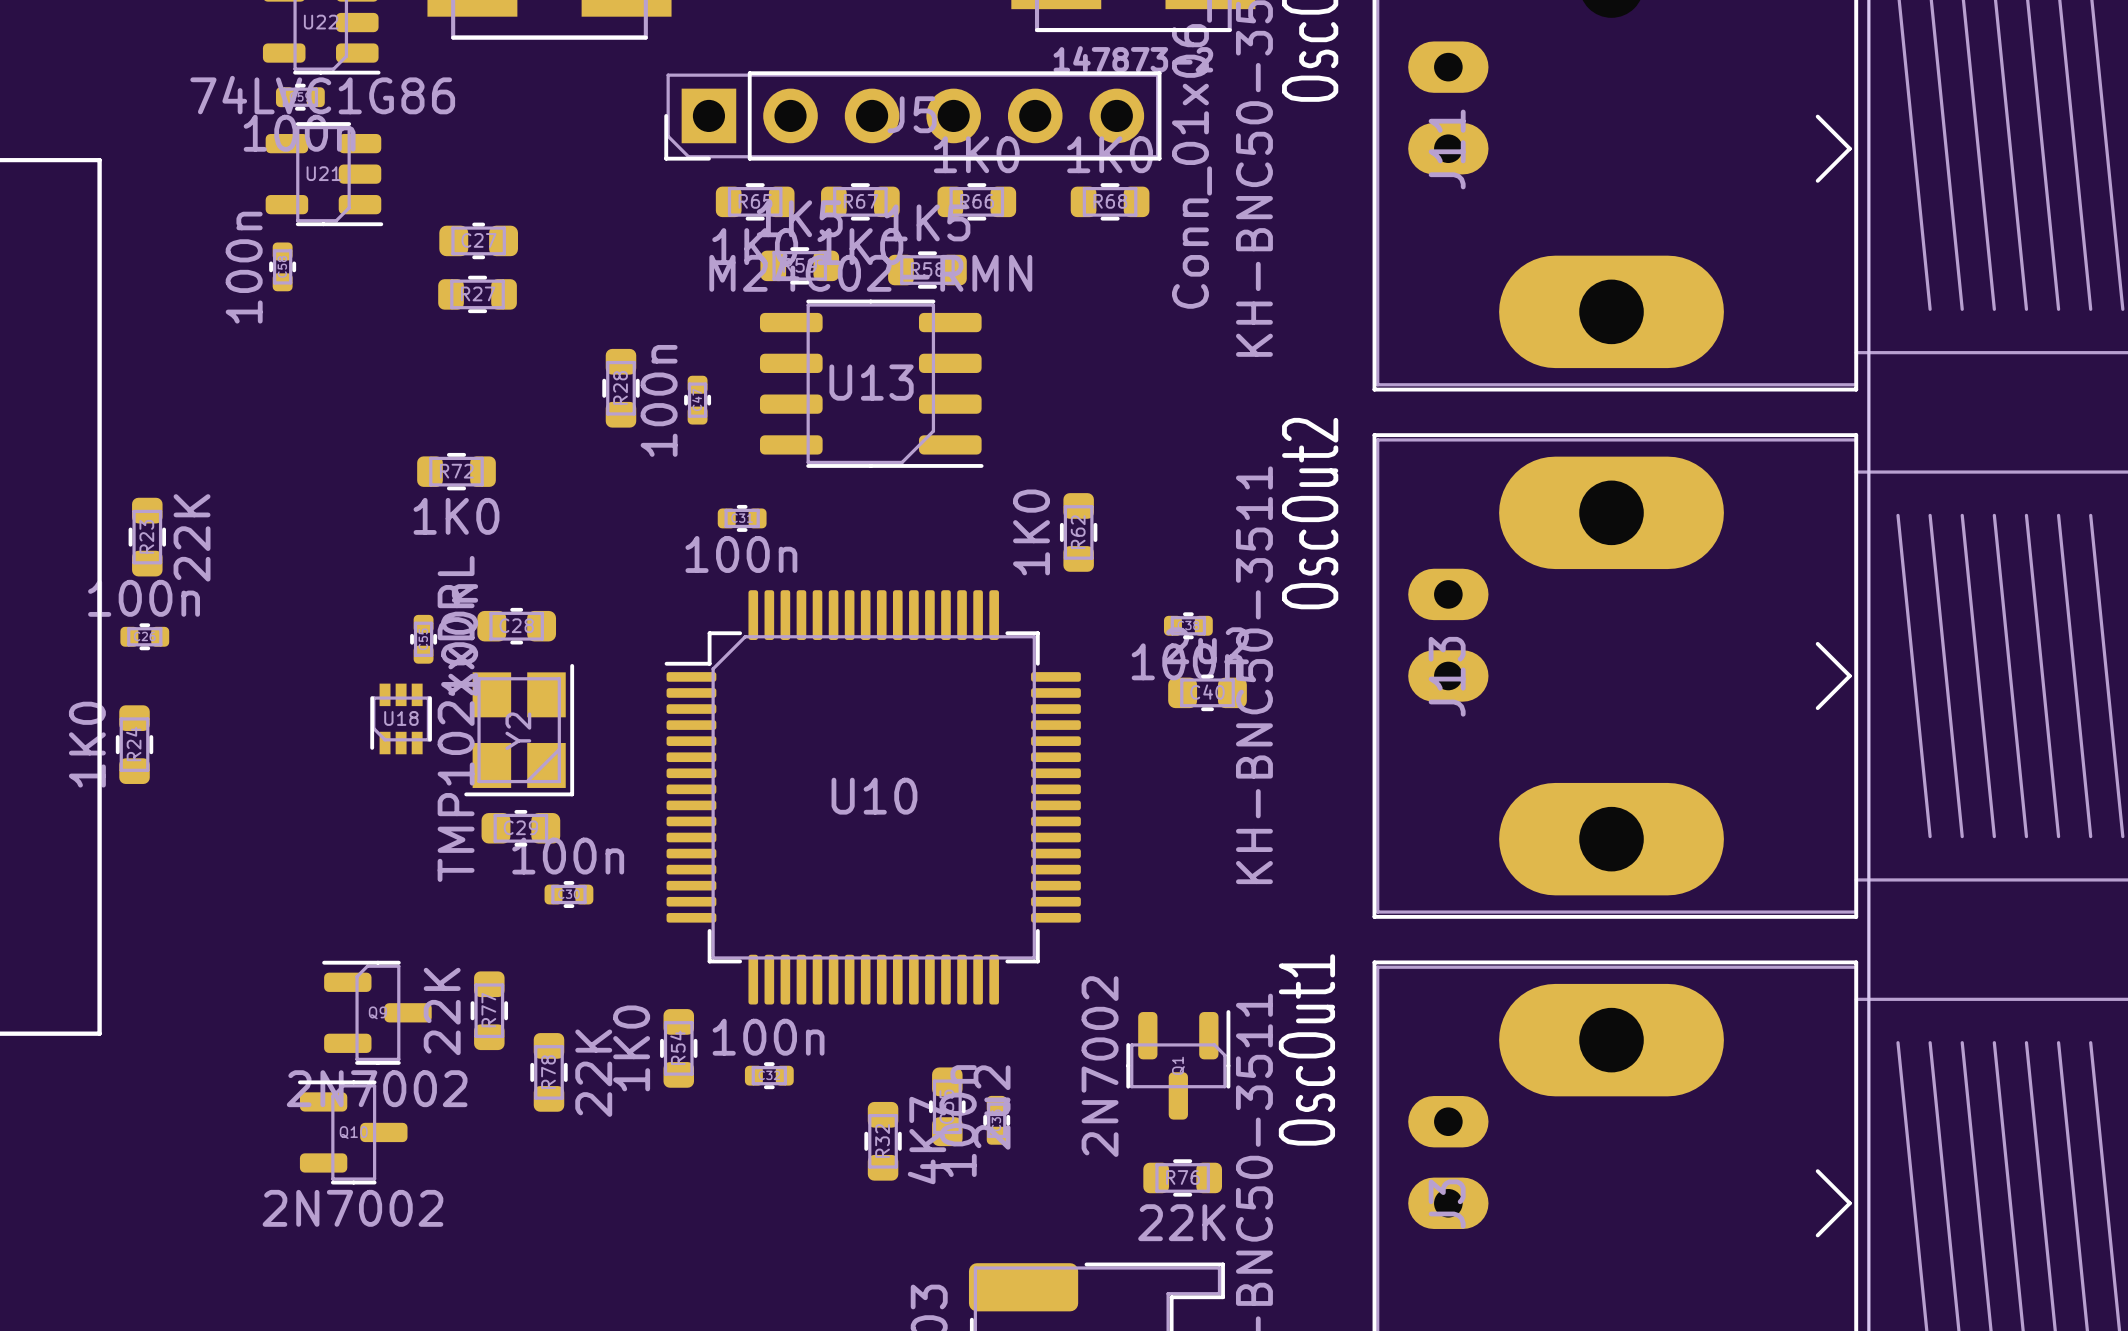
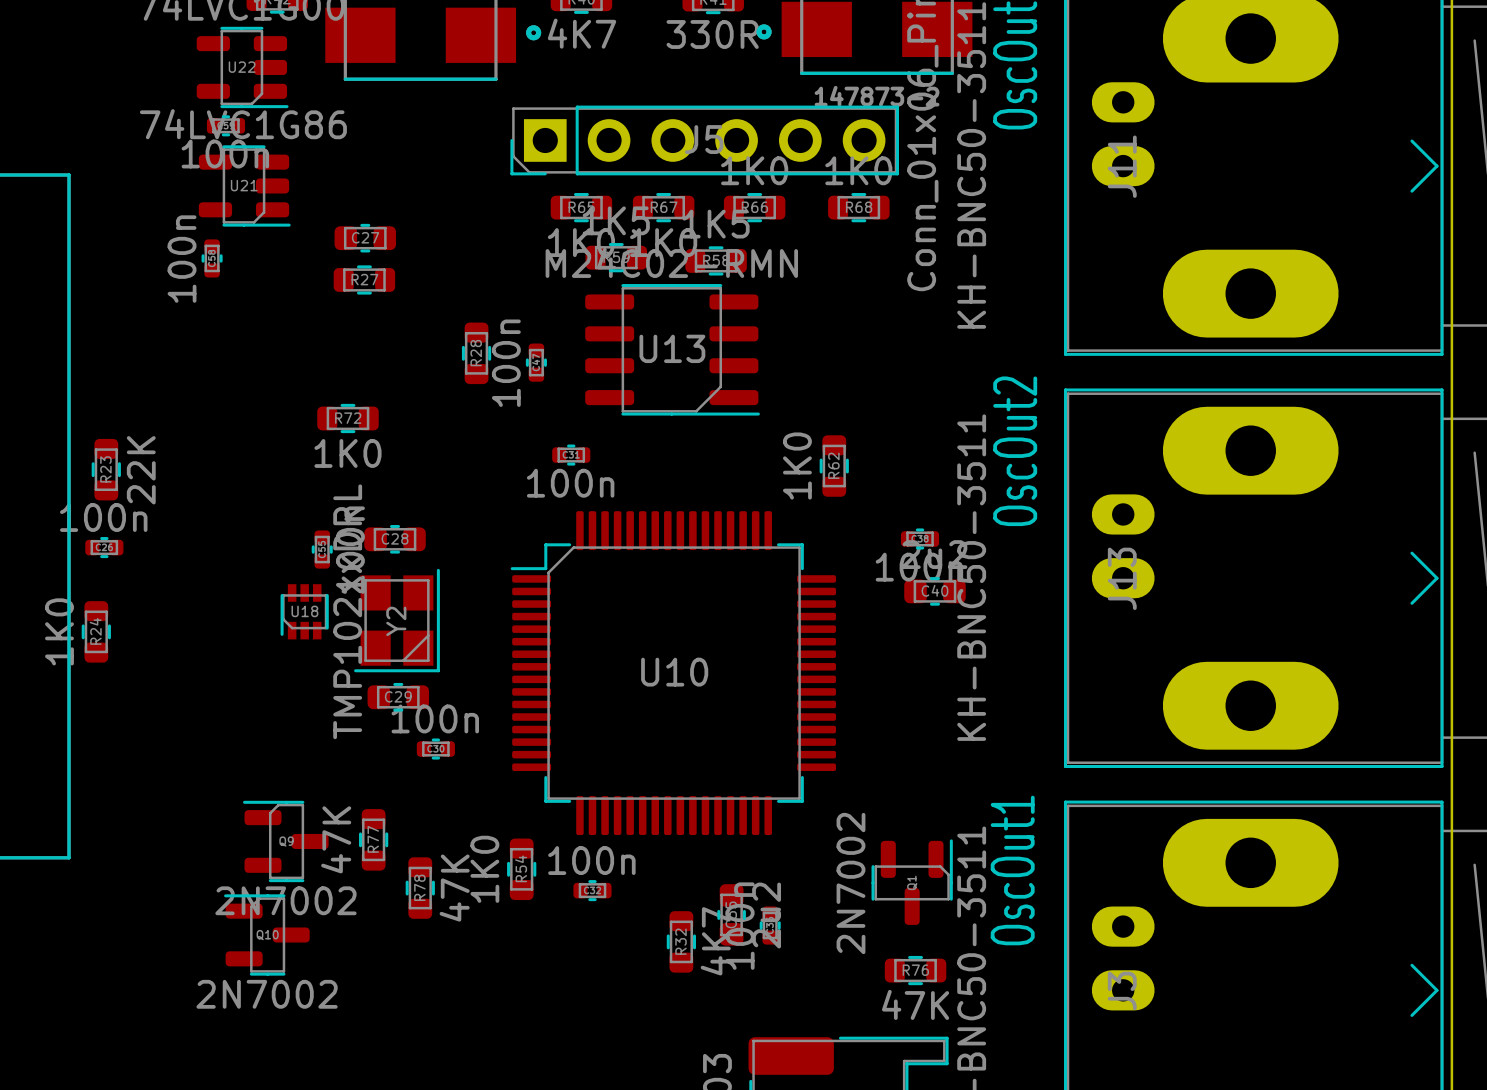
R77 value: 22K (442, 1011) -> 47K (336, 839)
R78 value: 22K (593, 1073) -> 47K (454, 888)
R76 value: 22K (1181, 1222) -> 47K (915, 1004)

